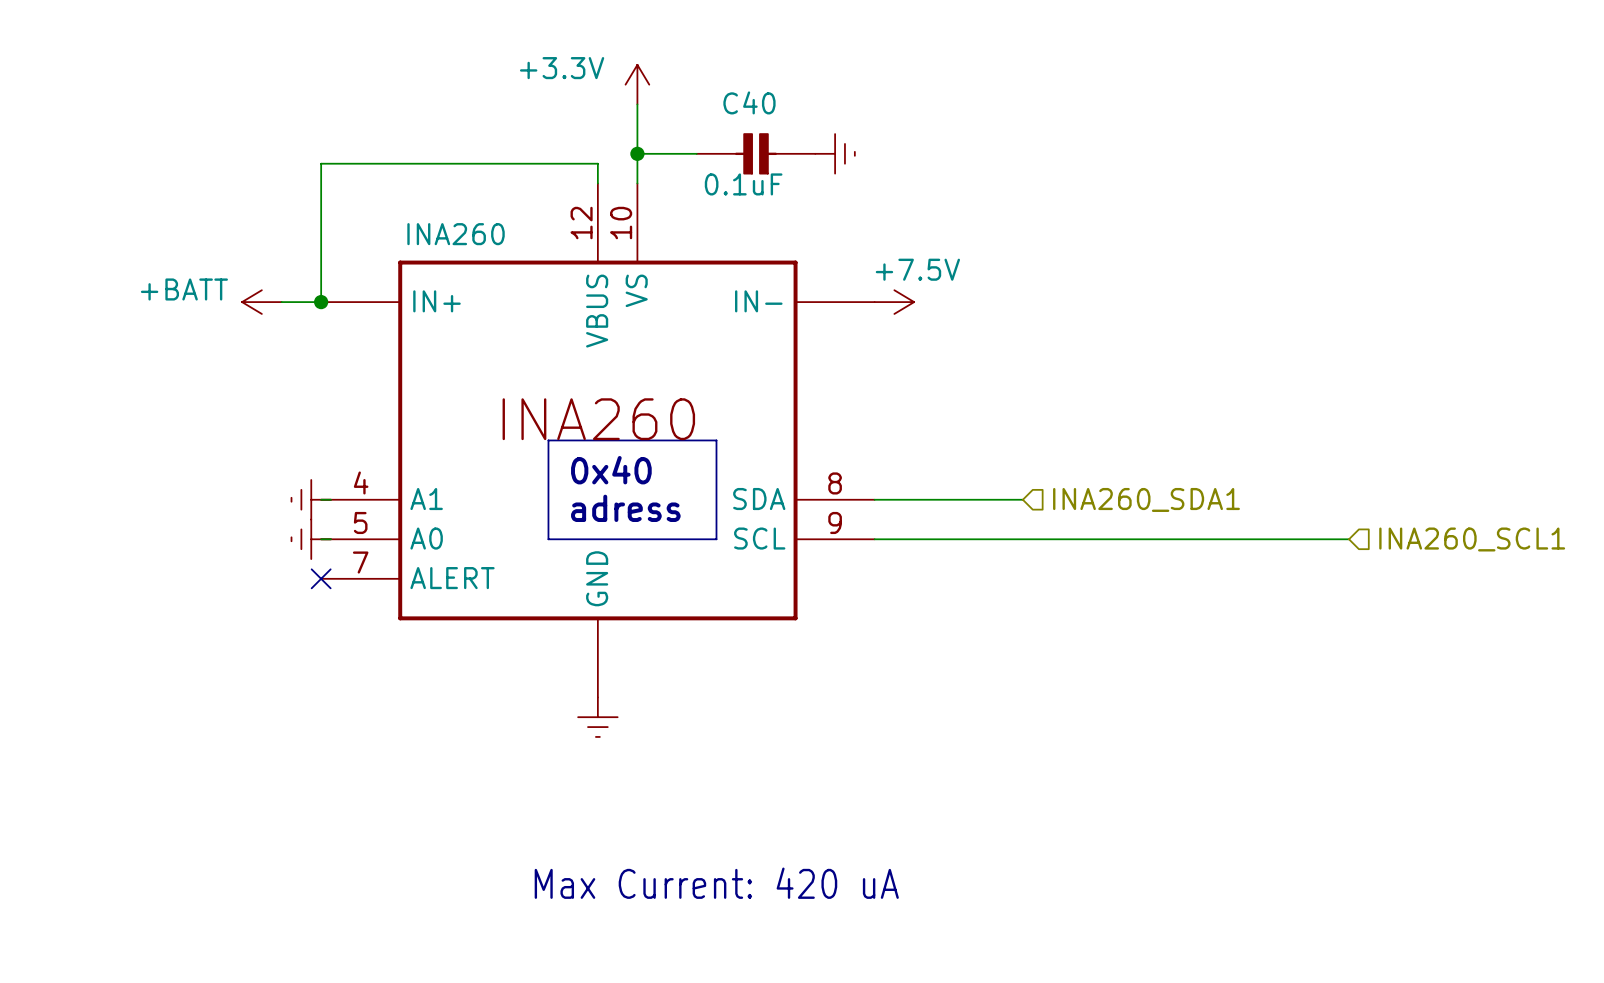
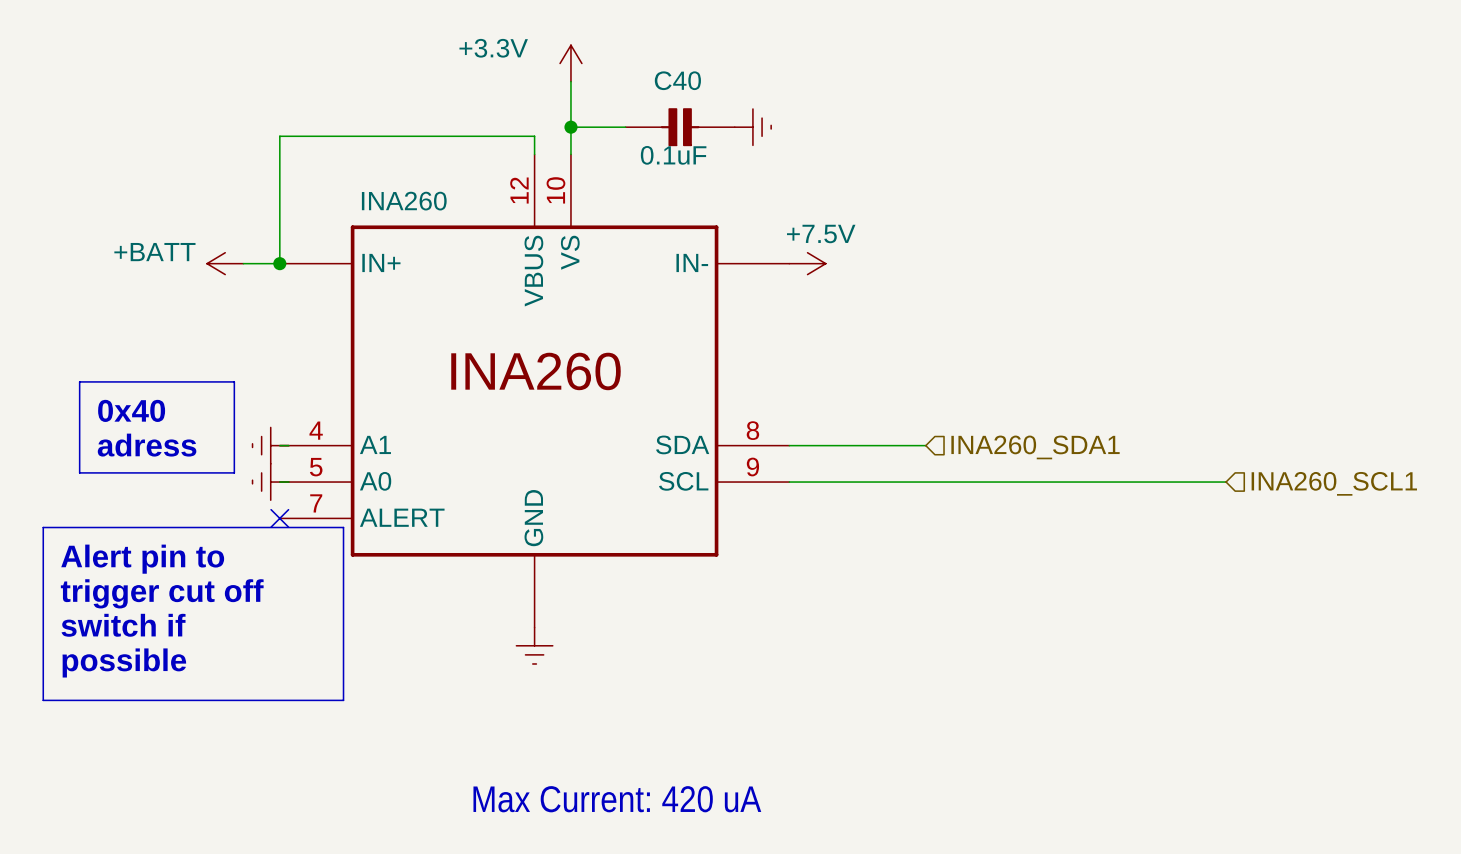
line: none -> (79, 381) (234, 381) (234, 472) (79, 472) (79, 381)
line: (548, 440) (716, 440) (716, 539) (548, 539) (548, 440) -> none
text: none -> 0x40 (131, 410)
text: 0x40 (611, 470) -> none
text: none -> adress (147, 445)
text: adress (625, 508) -> none
line: none -> (43, 527) (343, 527) (343, 700) (43, 700) (43, 527)
text: none -> Alert pin to (142, 559)
text: none -> trigger cut off (162, 593)
text: none -> switch if (123, 625)
text: none -> possible (124, 662)

